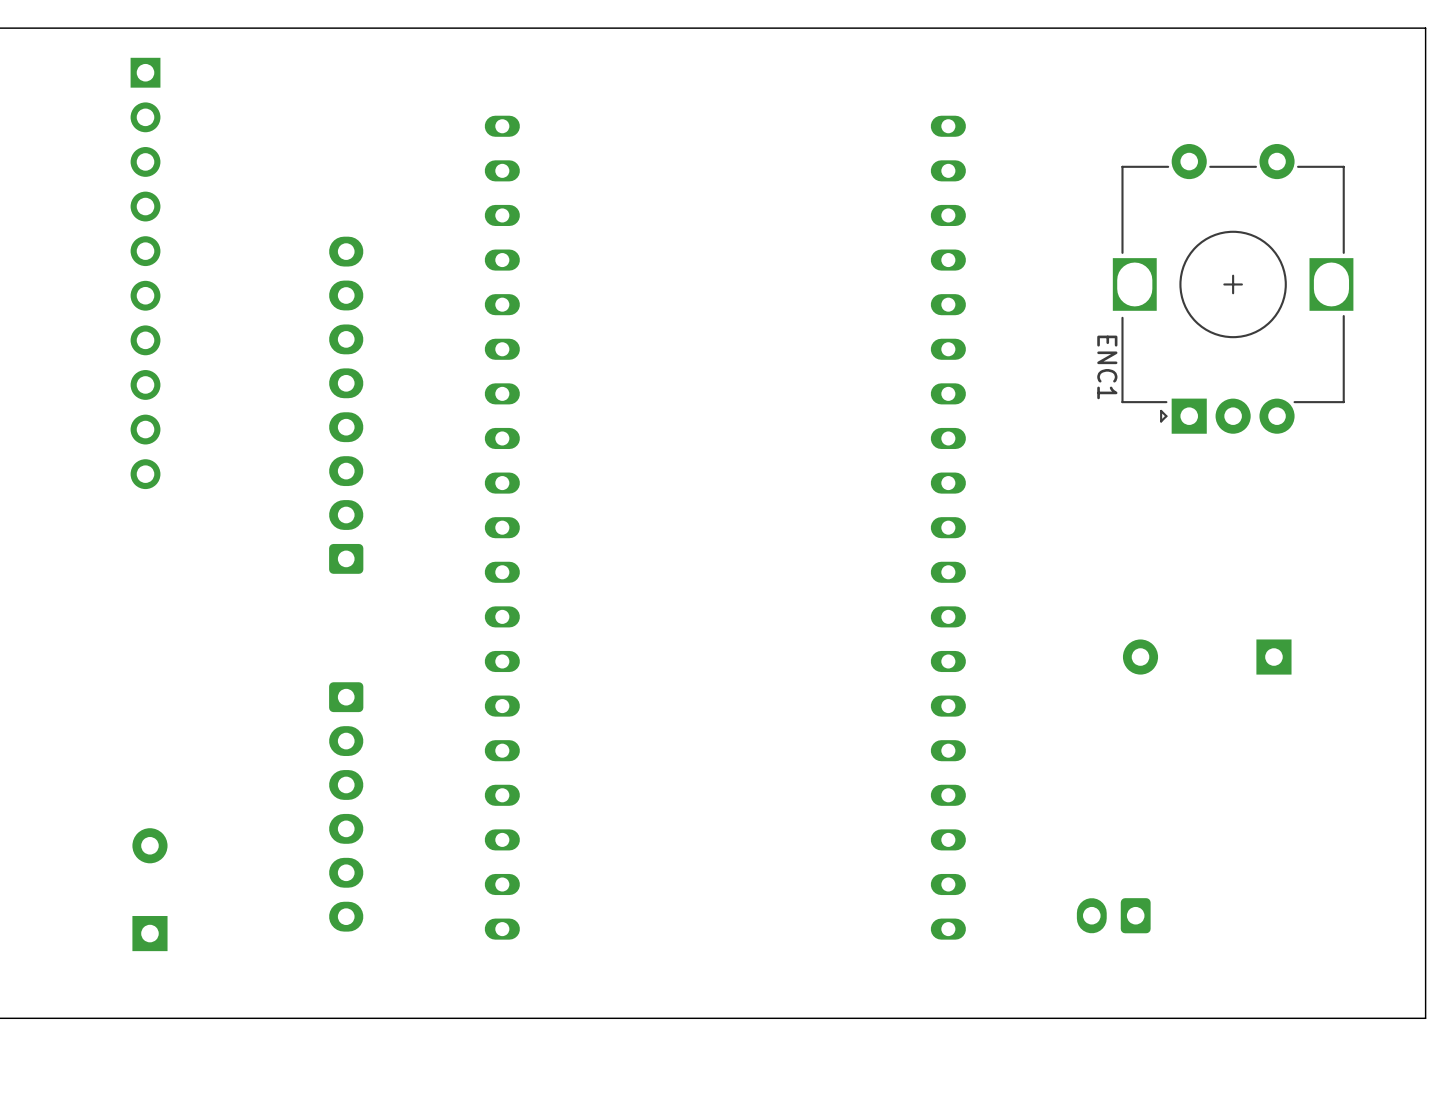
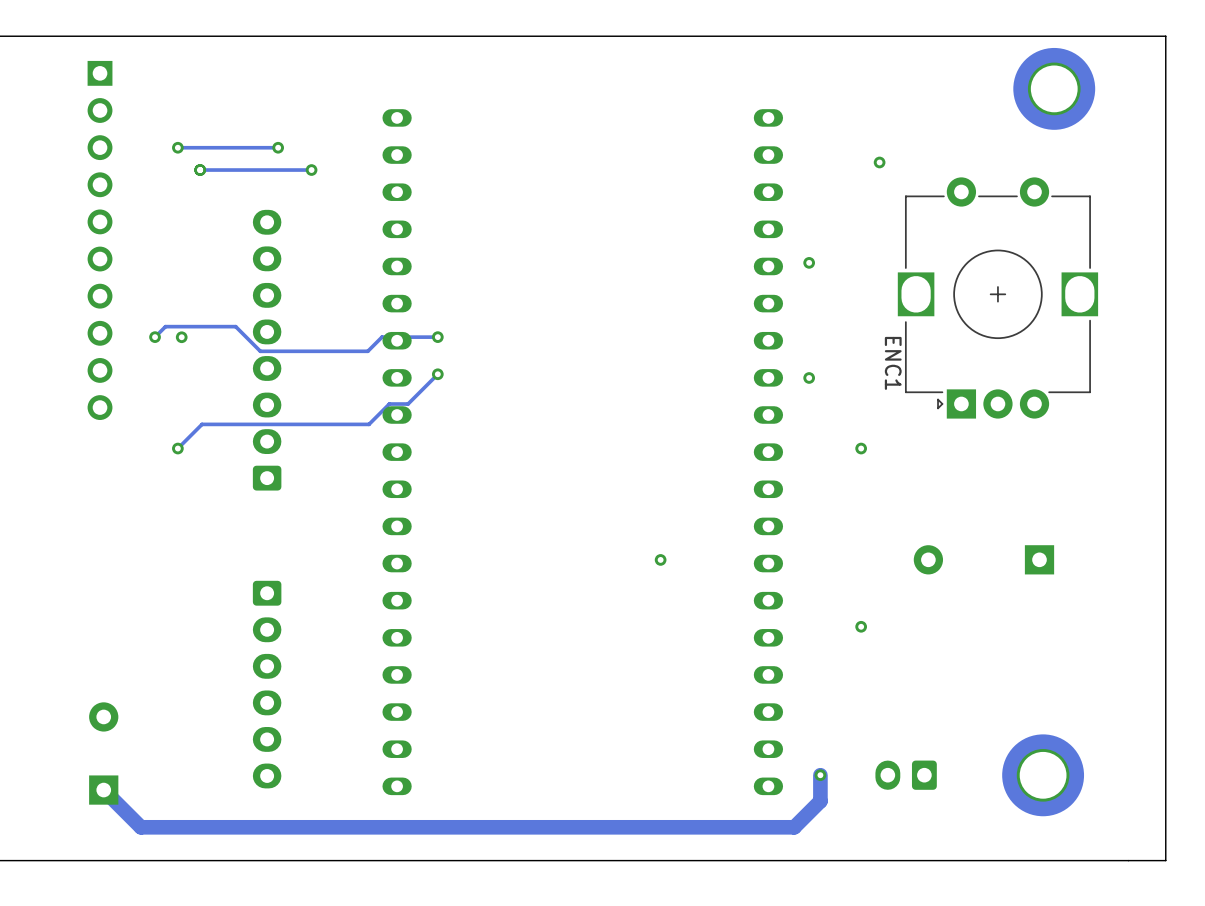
part: none -> (1054, 88)
via: none -> (177, 147)
track: none -> (278, 147) (177, 147)
via: none -> (278, 147)
via: none -> (879, 162)
via: none -> (200, 170)
track: none -> (311, 170) (200, 170)
via: none -> (311, 170)
ENC1 position: (1233, 288) -> (997, 297)
via: none -> (809, 262)
via: none -> (155, 337)
via: none -> (181, 337)
track: none -> (437, 337) (382, 337) (367, 351) (260, 351) (235, 326) (165, 326) (155, 337)
via: none -> (437, 337)
track: none -> (437, 374) (408, 404) (389, 404) (369, 424) (202, 424) (177, 448)
via: none -> (437, 374)
via: none -> (809, 377)
via: none -> (177, 448)
via: none -> (861, 448)
via: none -> (660, 559)
via: none -> (861, 626)
track: none -> (820, 775) (820, 801) (794, 827) (140, 827) (103, 790)
via: none -> (820, 775)
part: none -> (1043, 775)

